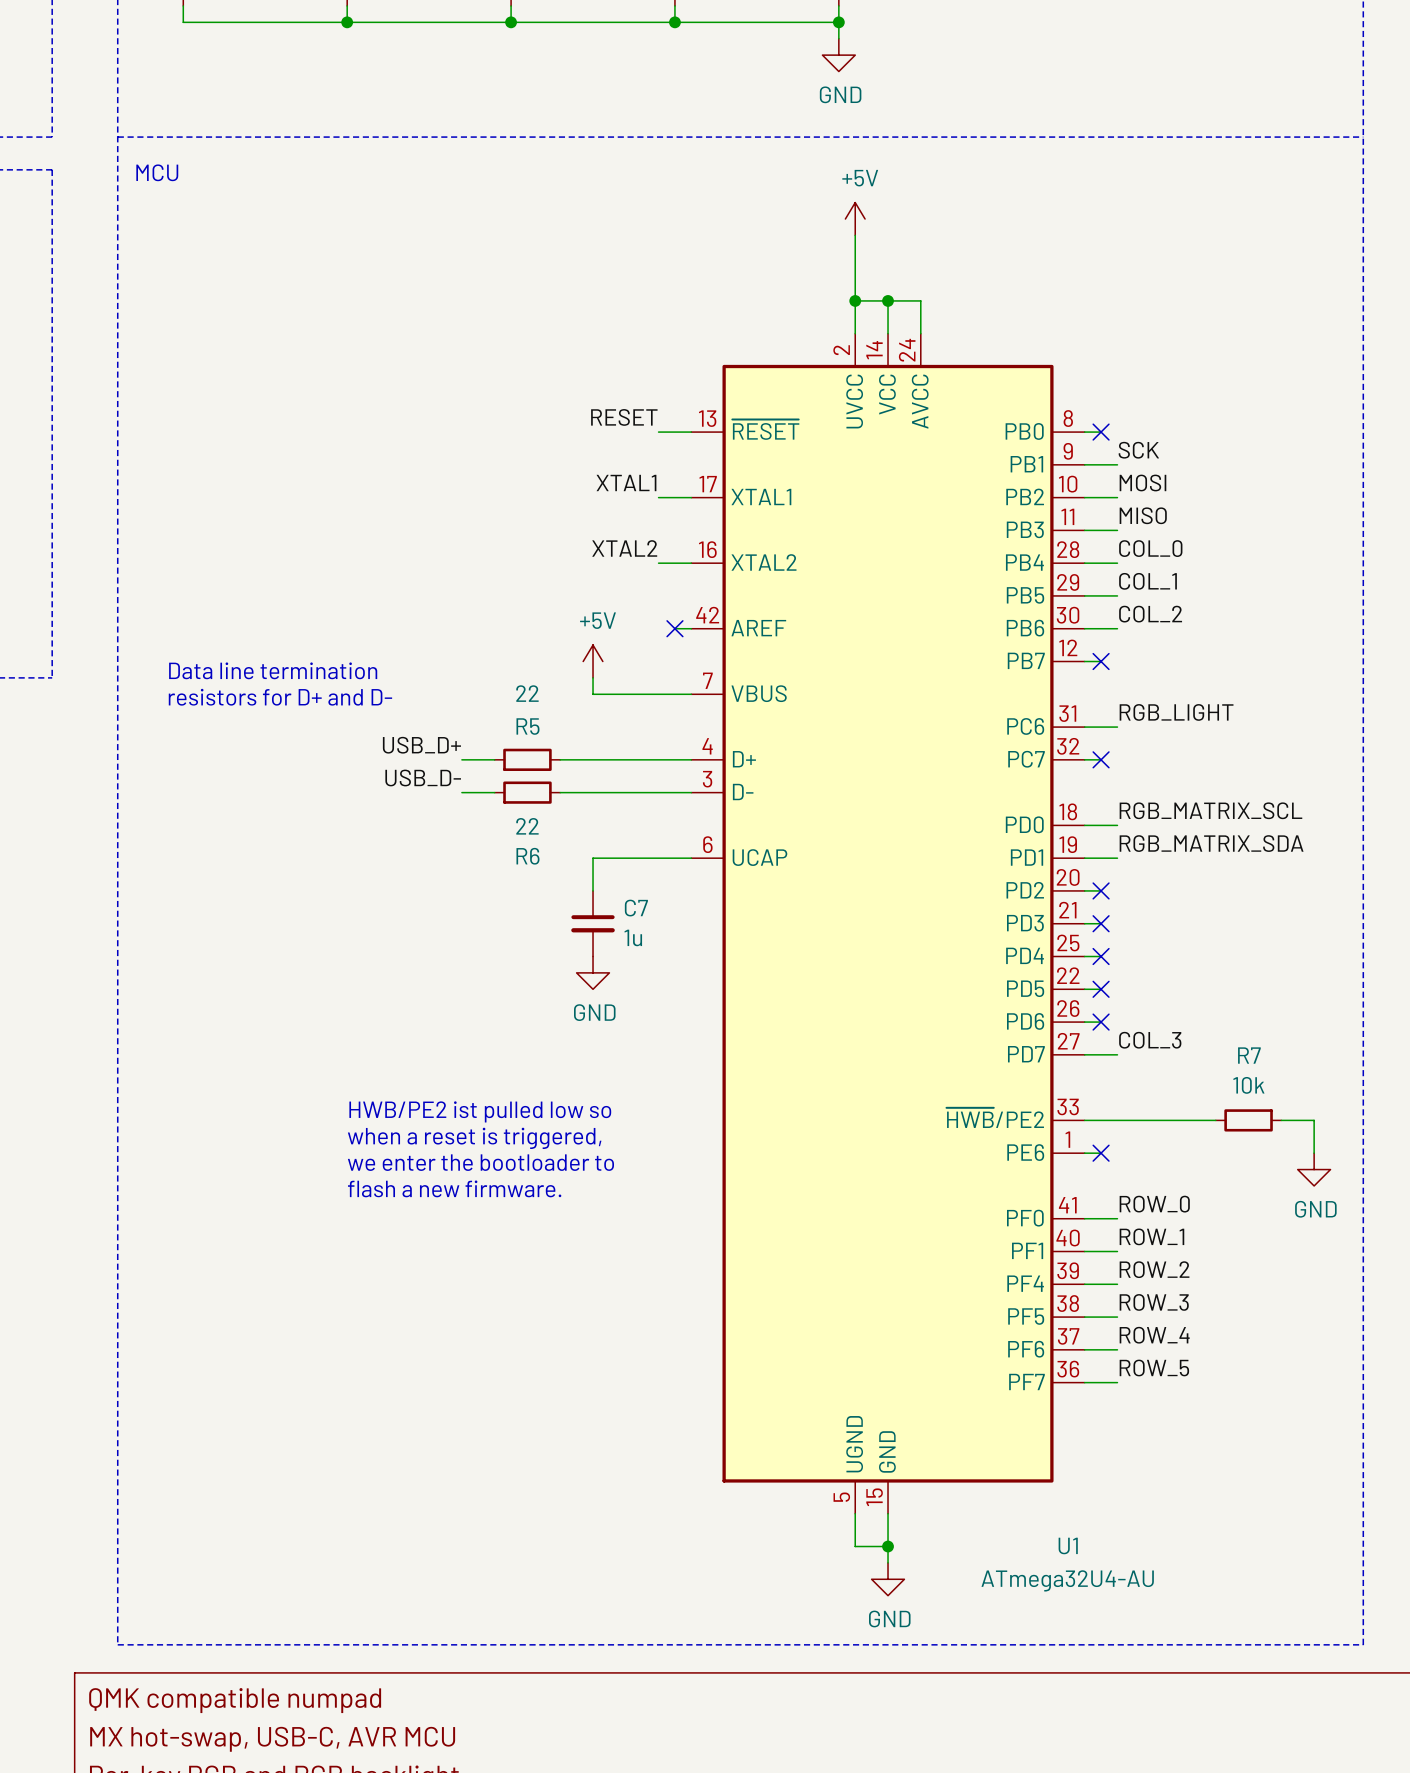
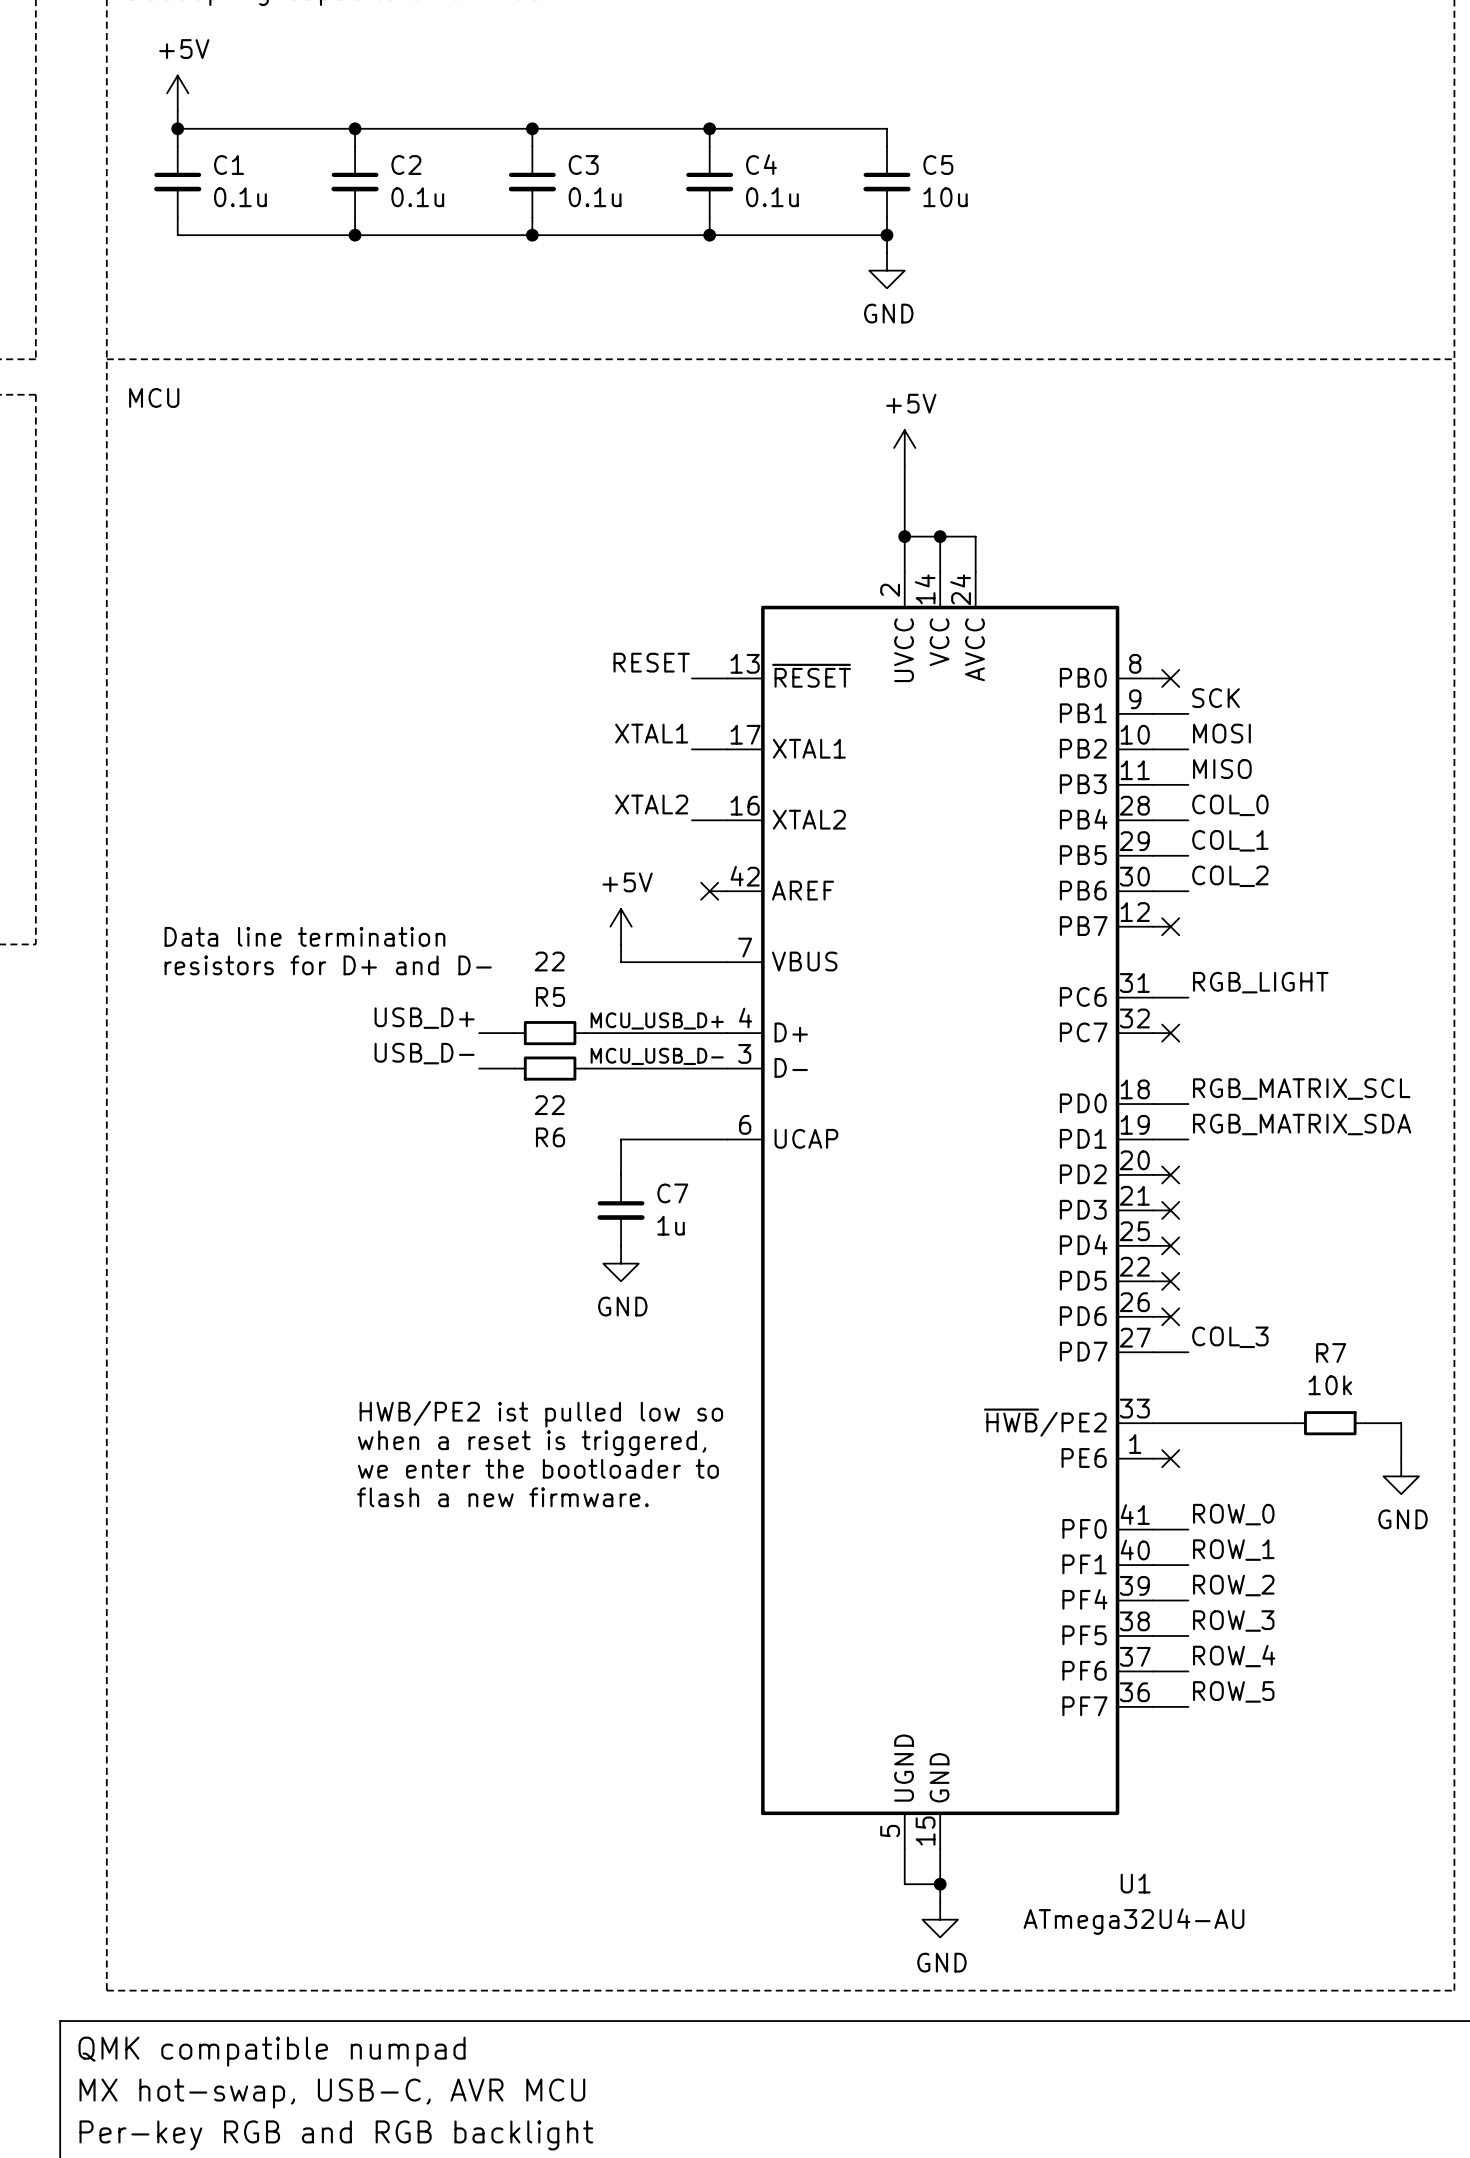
label: none -> MCU_USB_D+ (657, 1020)
label: none -> MCU_USB_D- (657, 1056)

